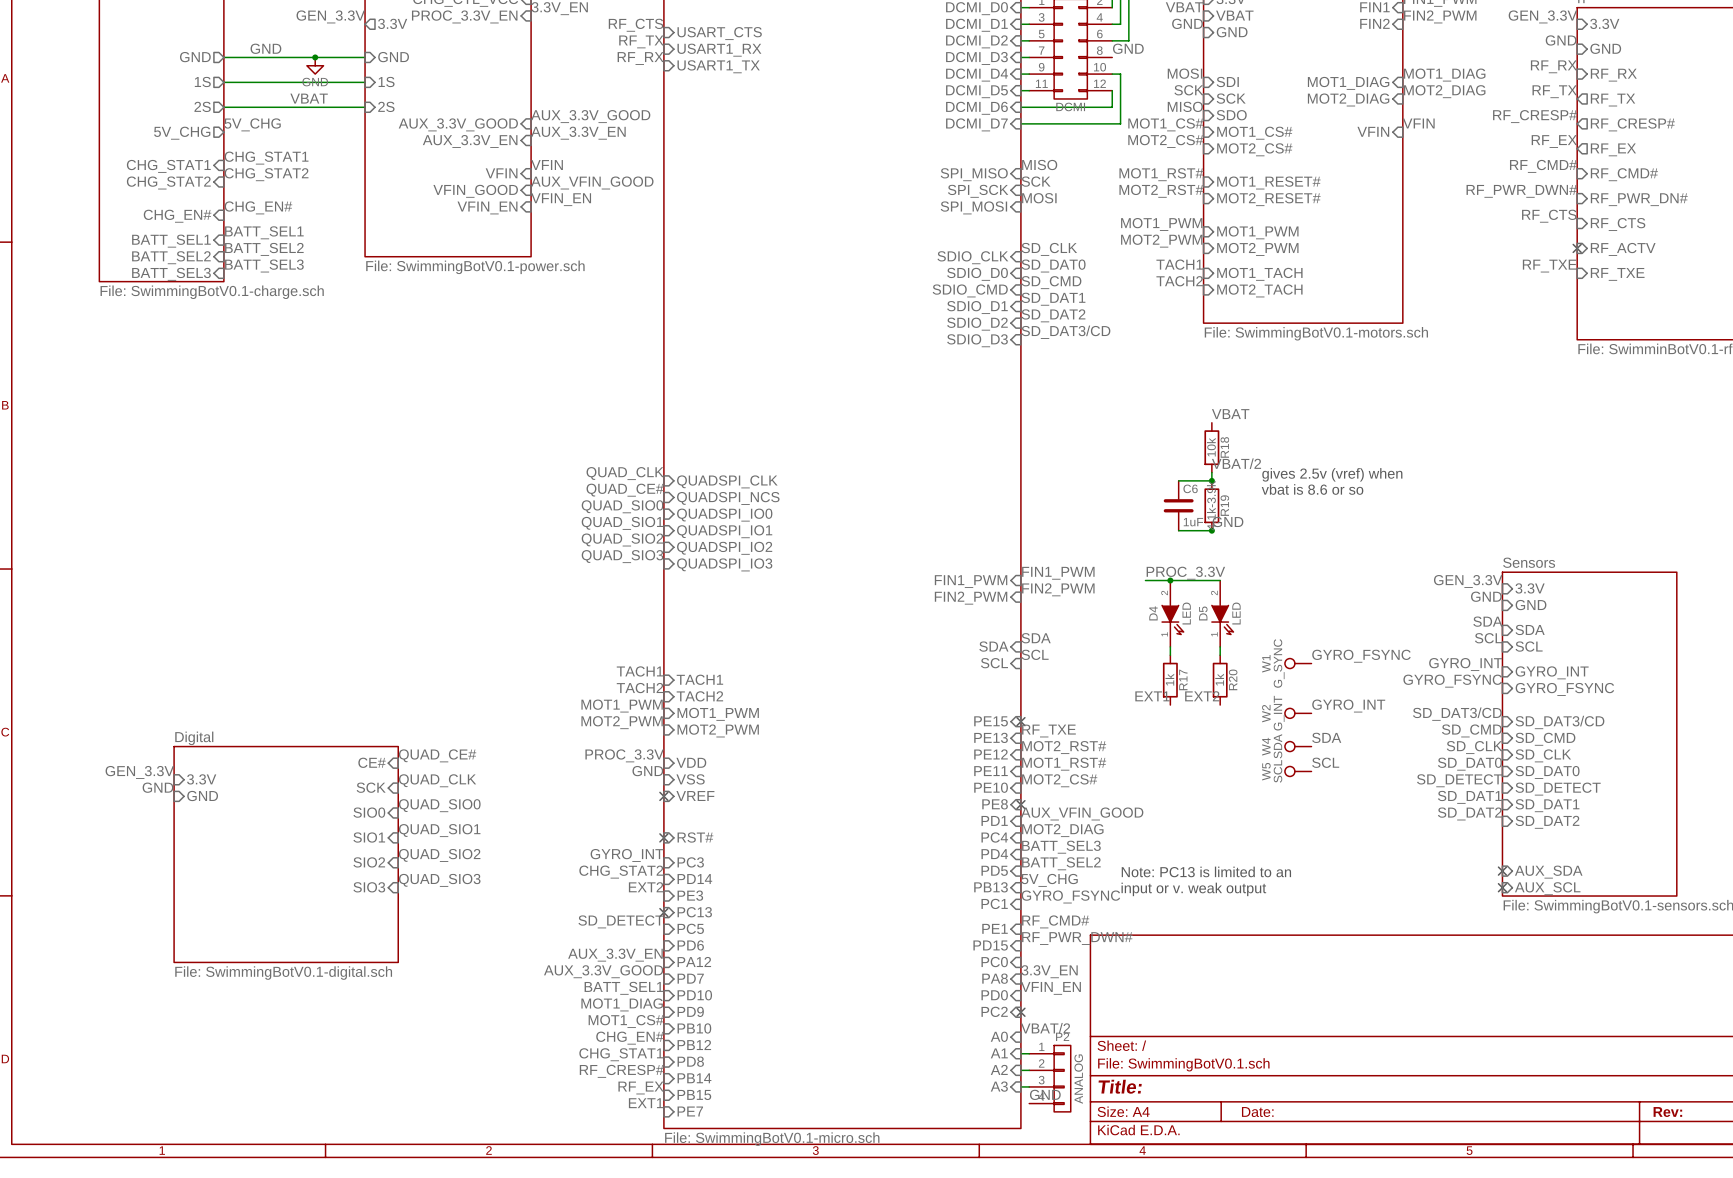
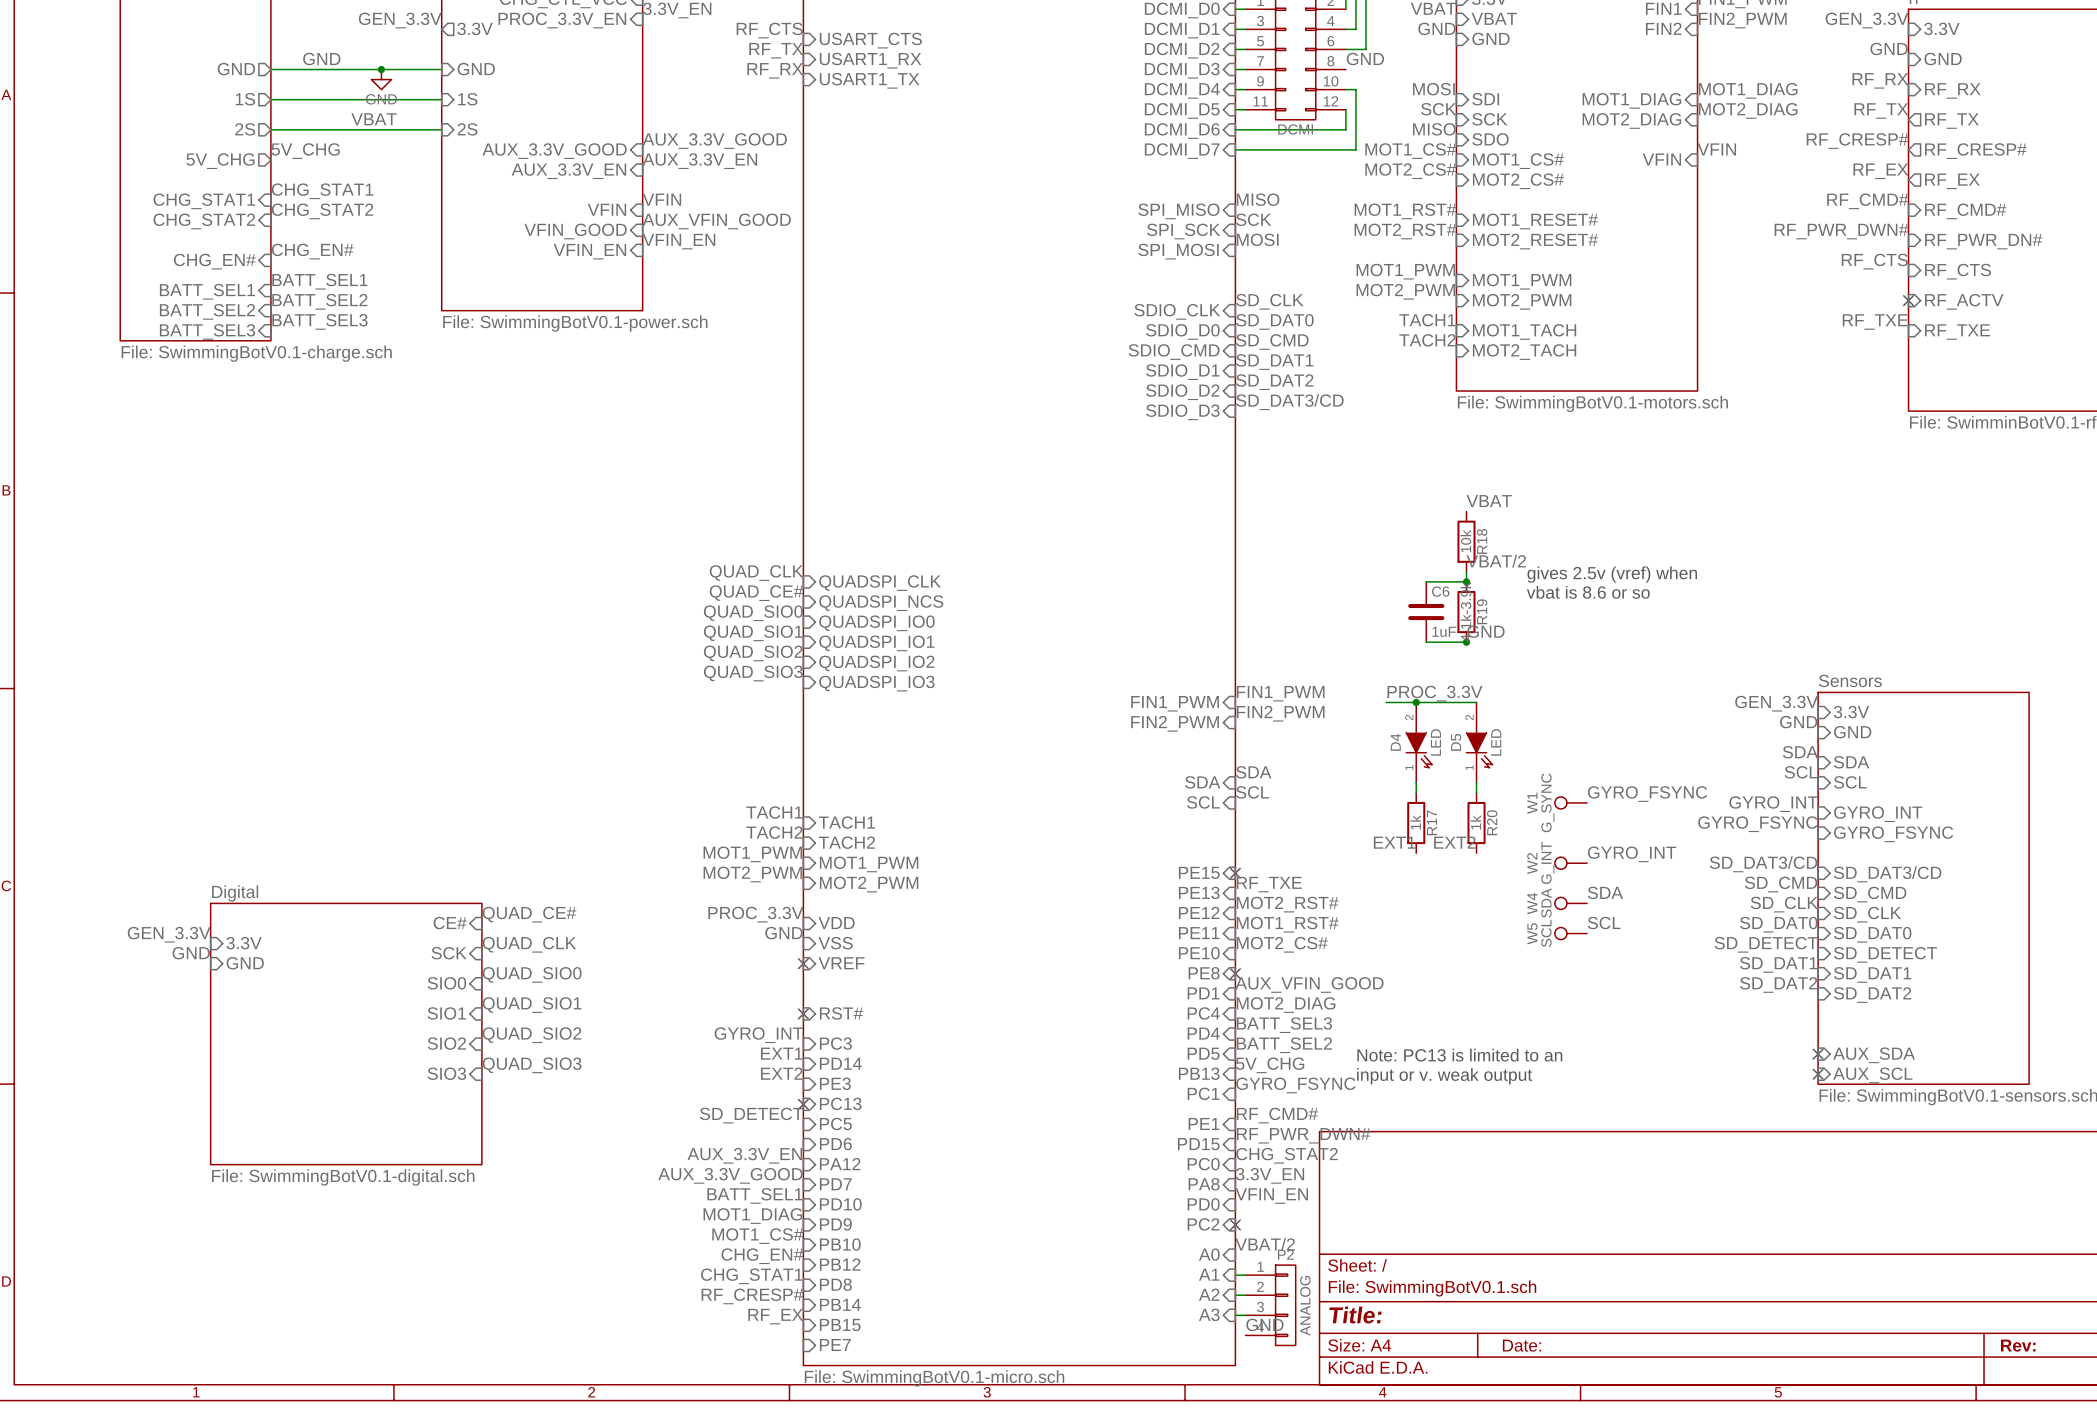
label: CHG_STAT2 (621, 872) -> EXT1 (781, 1053)
label: none -> CHG_STAT2 (1287, 1155)
label: EXT1 (646, 1103) -> none

